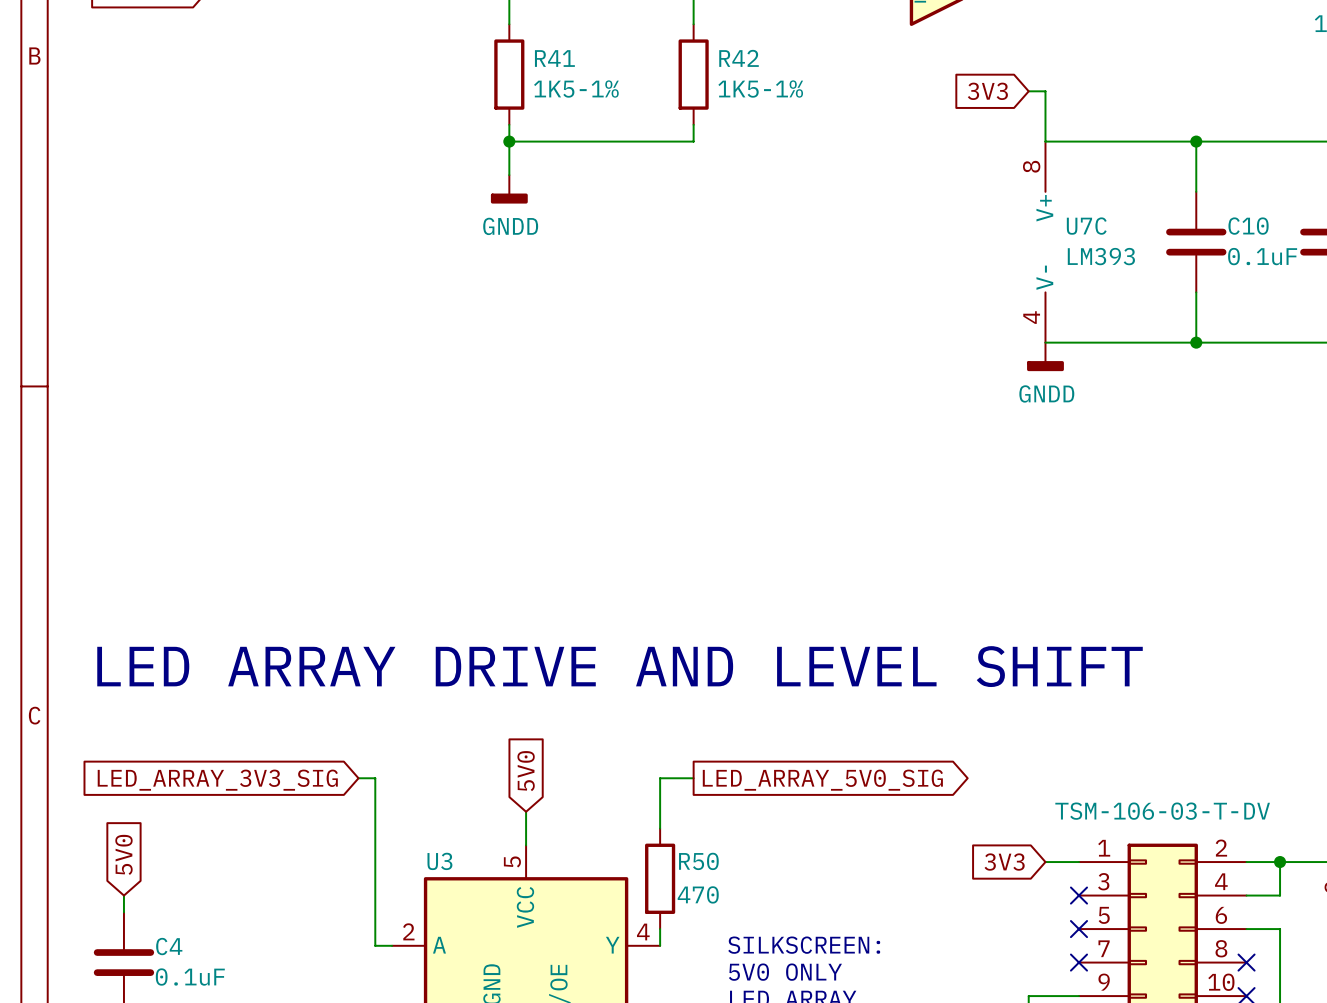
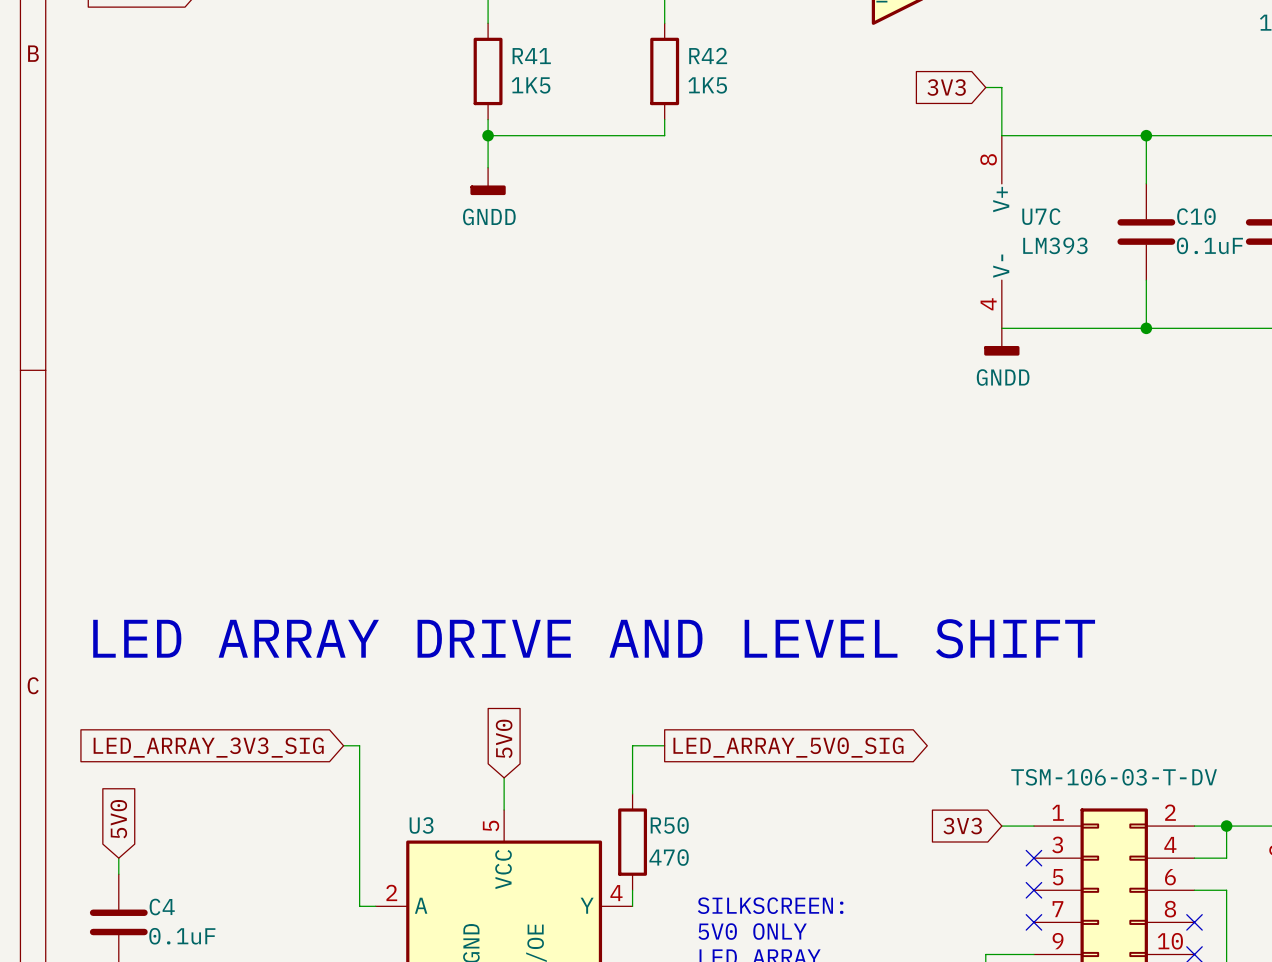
R41 value: 1K5-1% (576, 89) -> 1K5 (531, 85)
R42 value: 1K5-1% (760, 89) -> 1K5 (707, 85)

